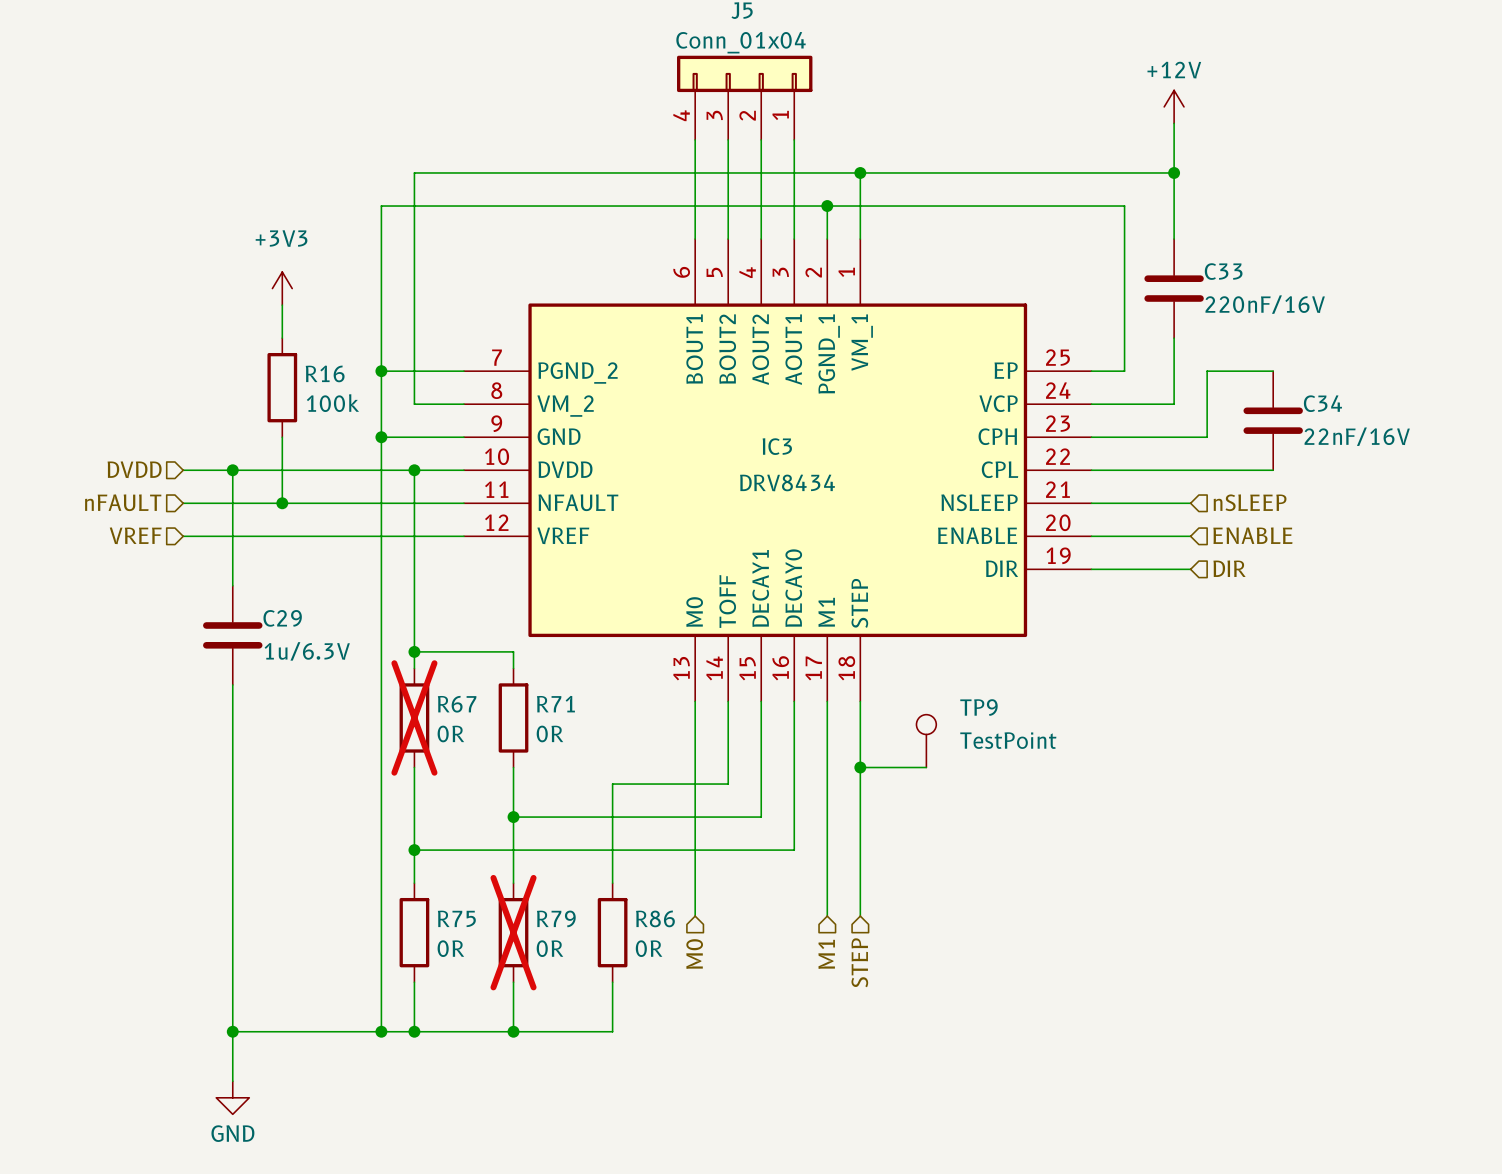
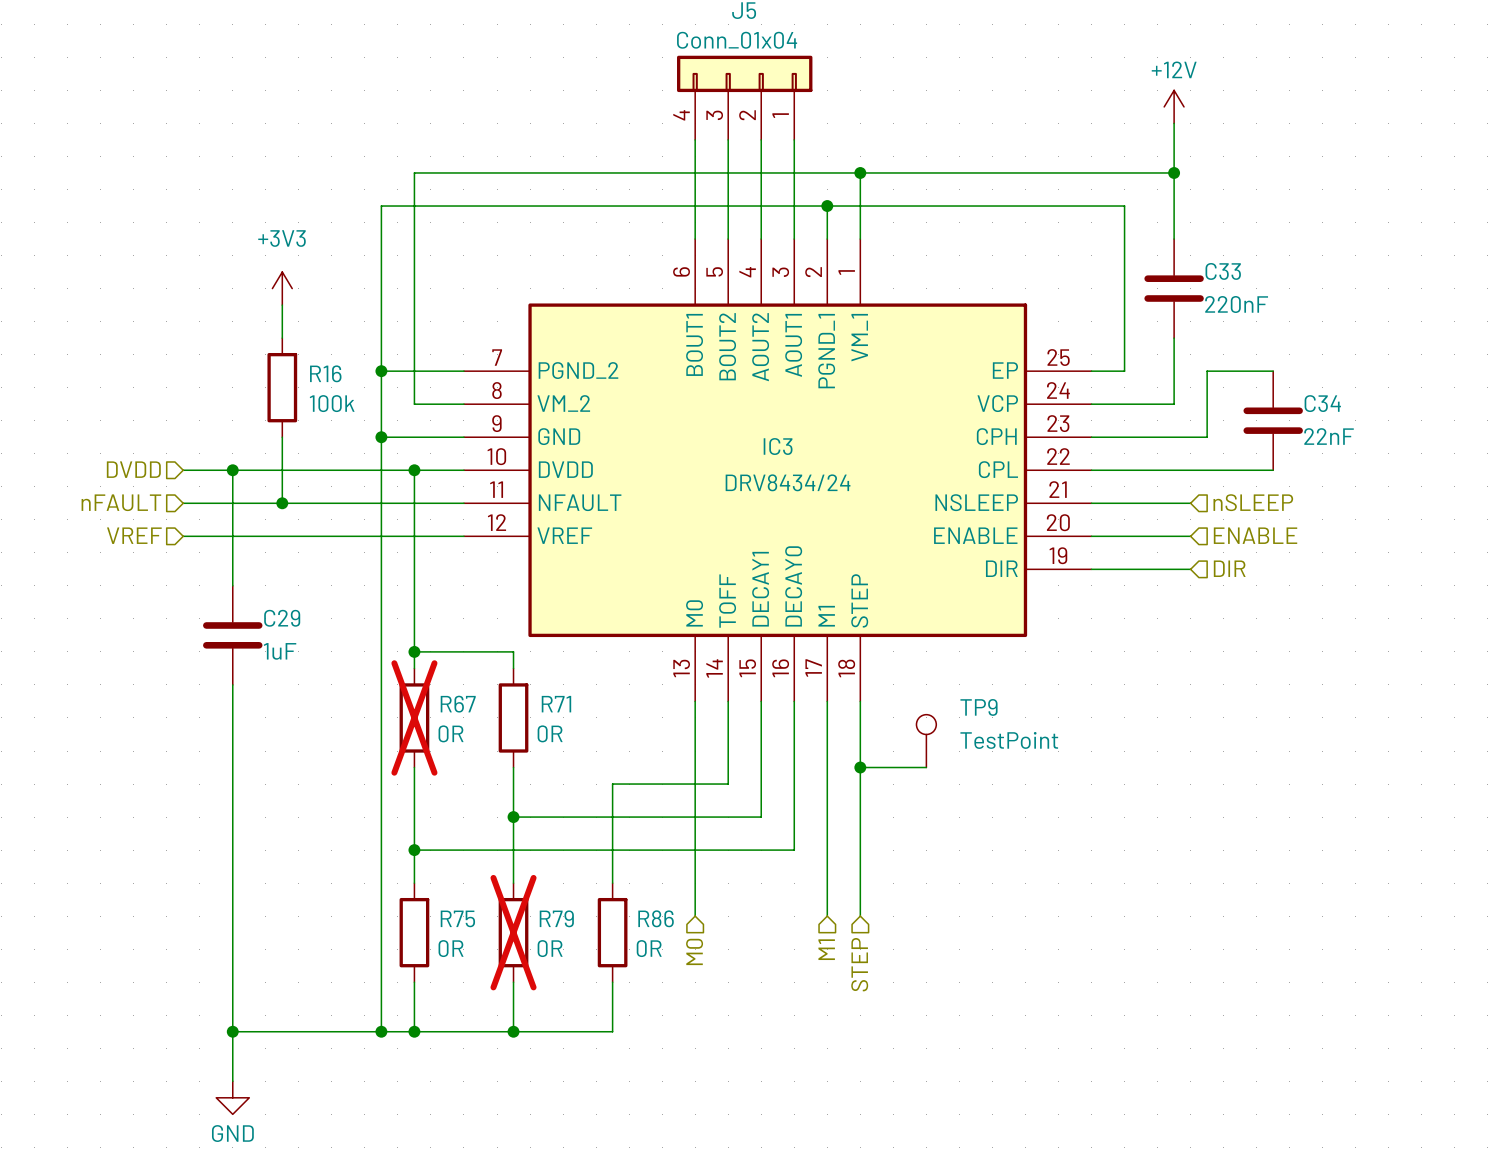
C33 value: 220nF/16V (1265, 304) -> 220nF (1236, 304)
C34 value: 22nF/16V (1357, 436) -> 22nF (1329, 436)
IC3 value: DRV8434 (787, 482) -> DRV8434/24 (788, 482)
C29 value: 1u/6.3V (307, 651) -> 1uF (280, 651)

